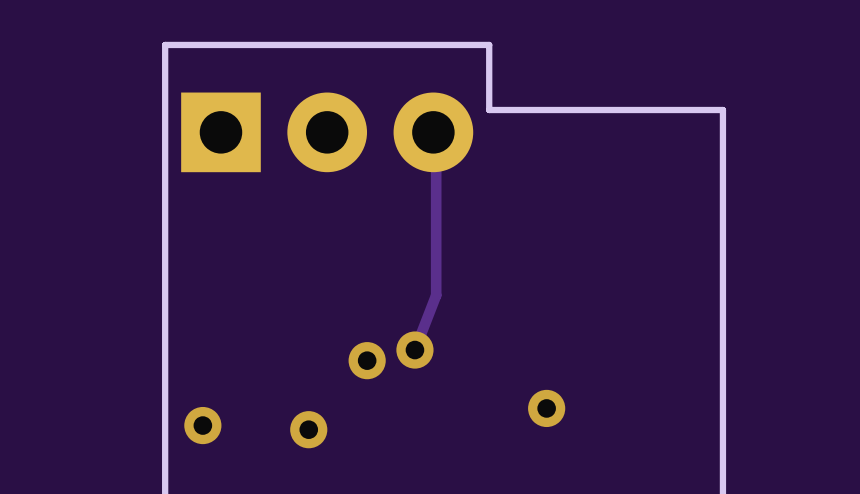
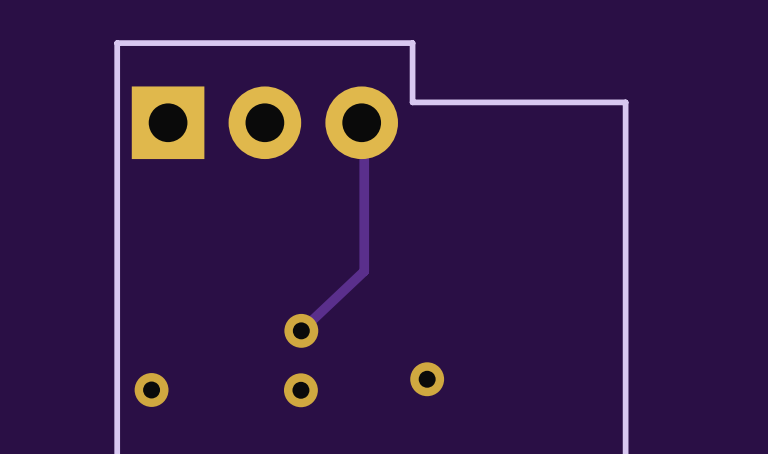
track: (436, 295) (414, 350) -> (364, 271) (300, 331)
via: (414, 350) -> none
via position: (546, 408) -> (427, 379)
via: none -> (300, 390)
via: (308, 429) -> none

